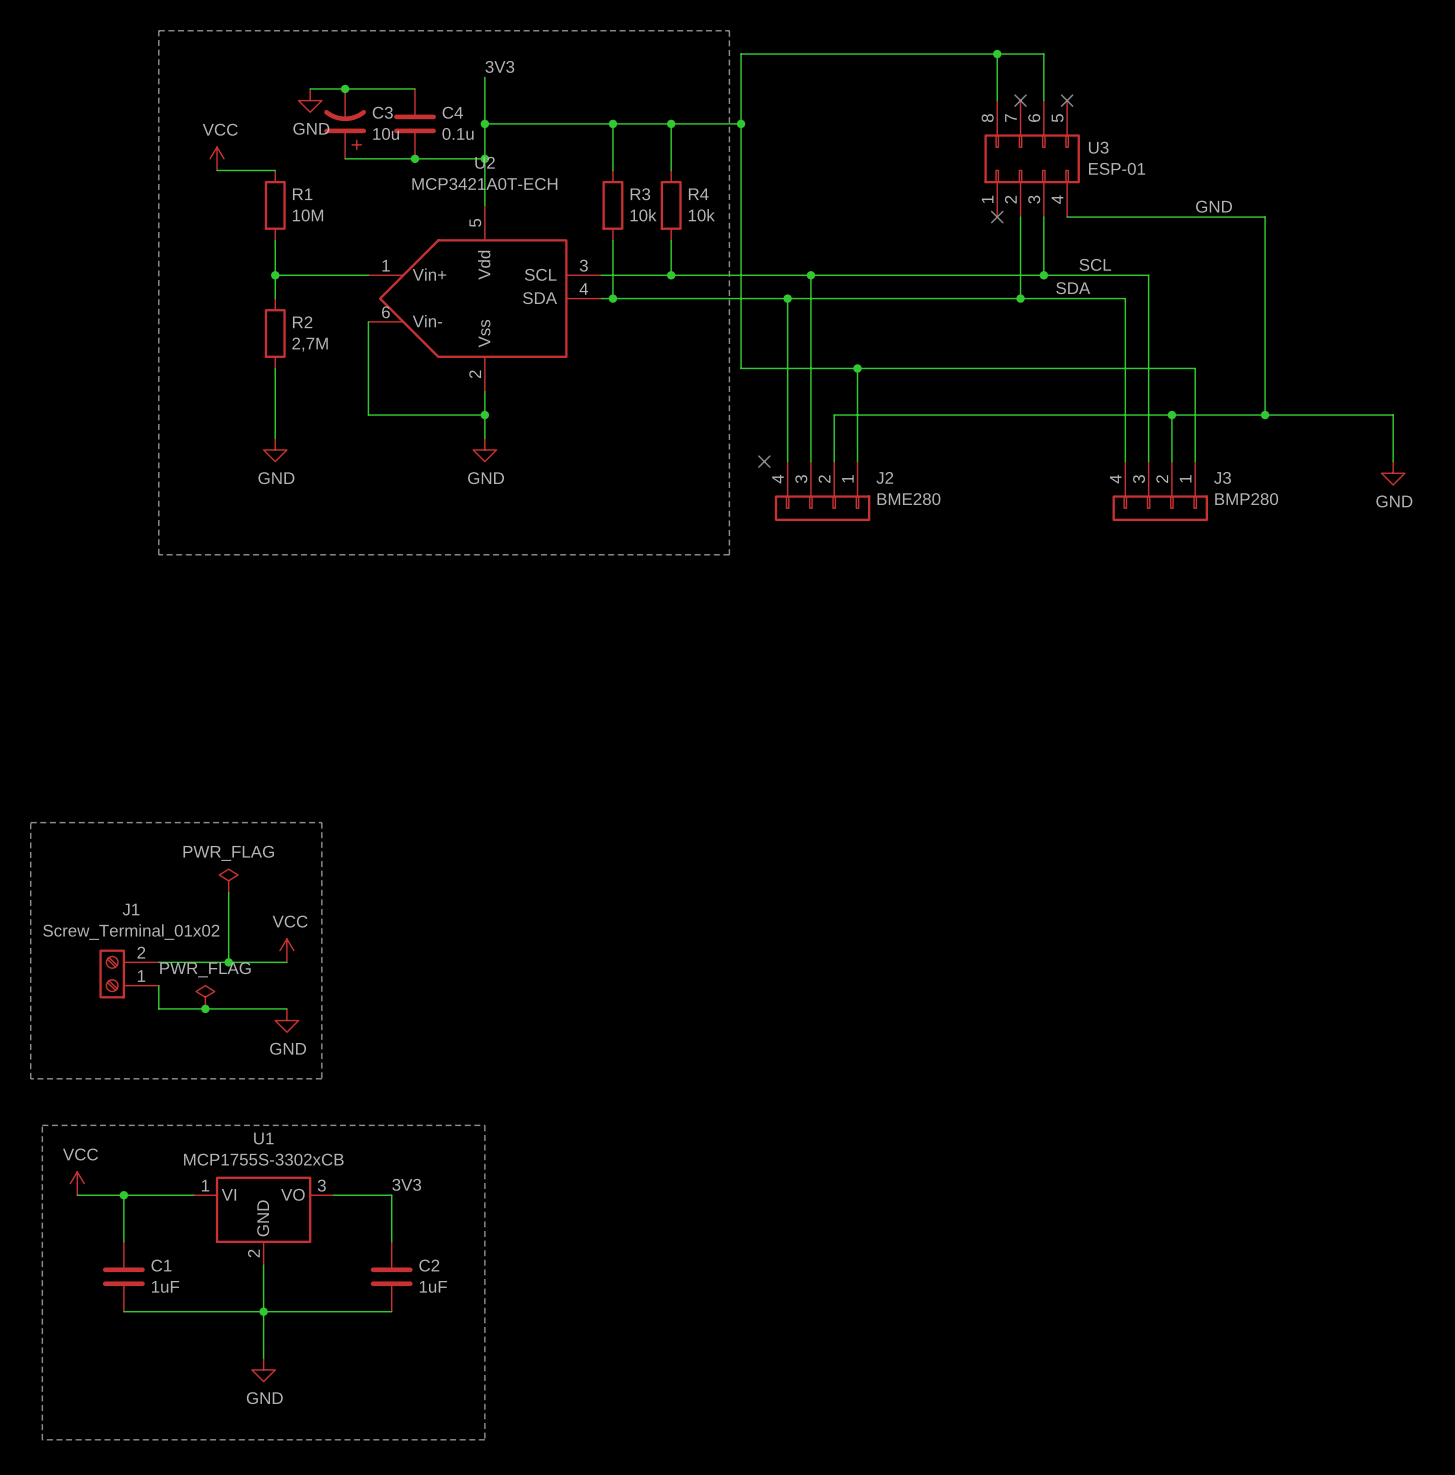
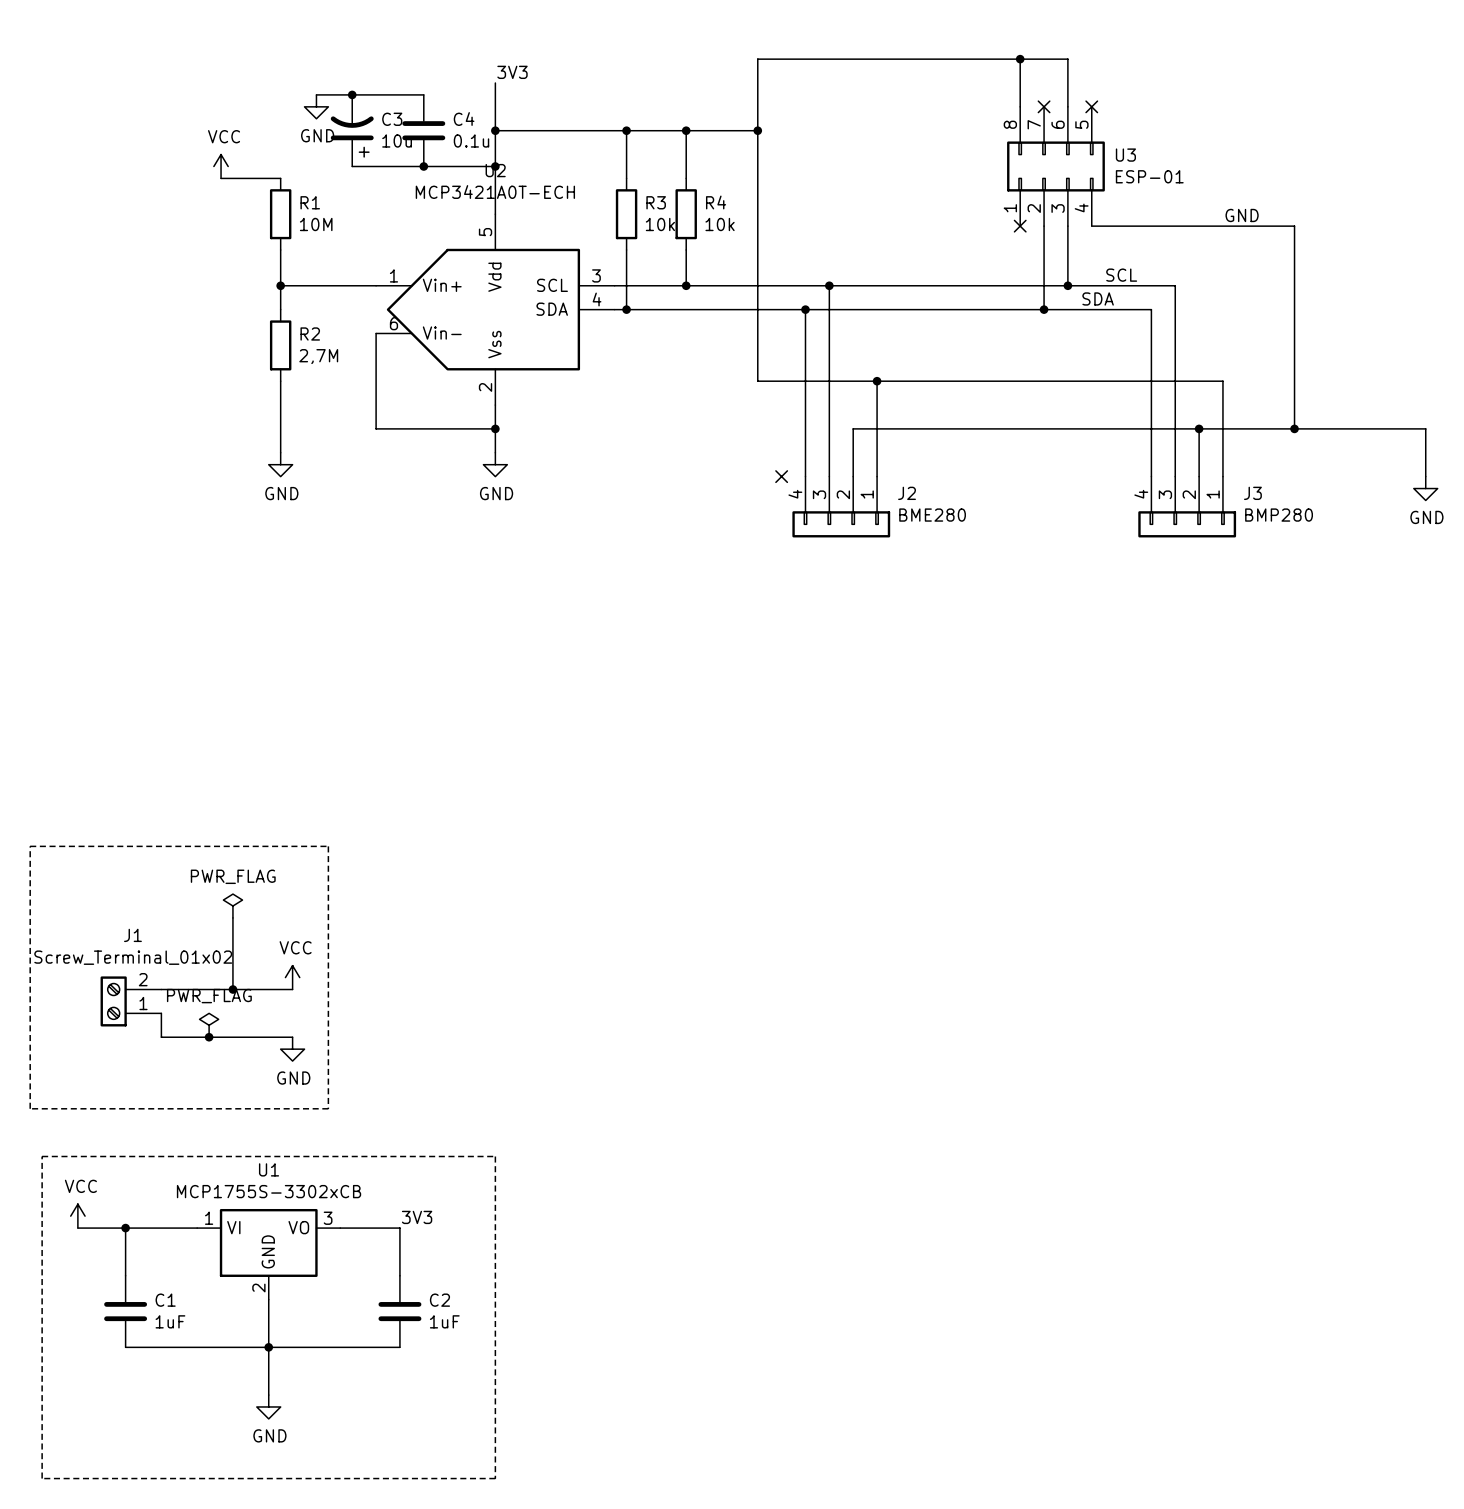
line: (158, 30) (729, 30) (729, 554) (158, 554) (158, 30) -> none

